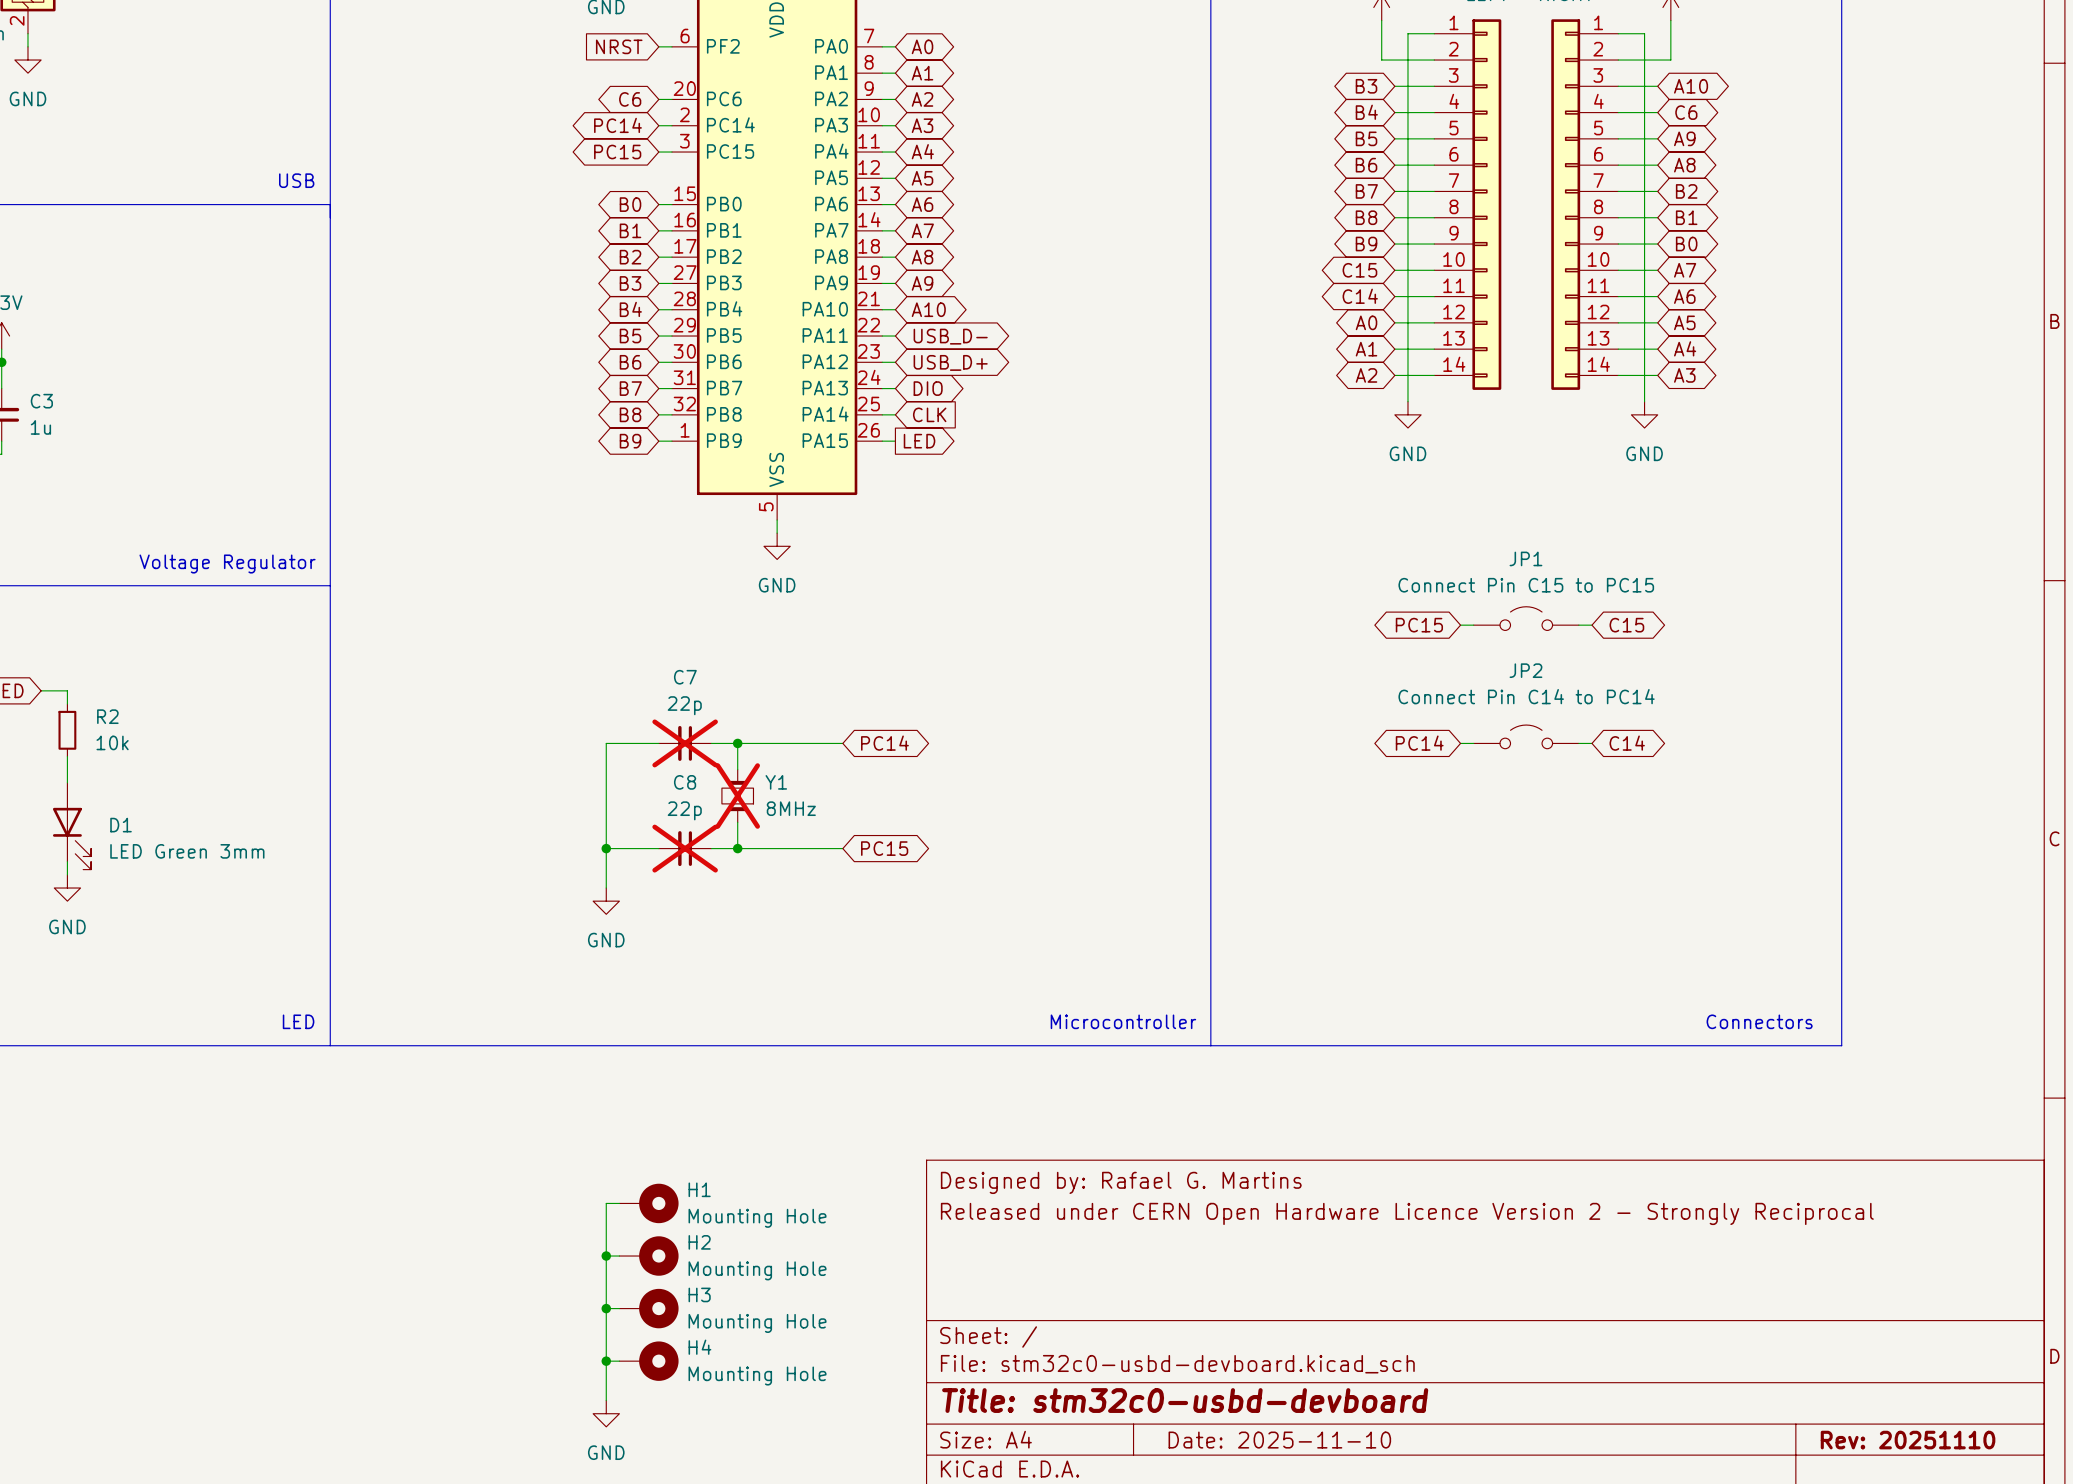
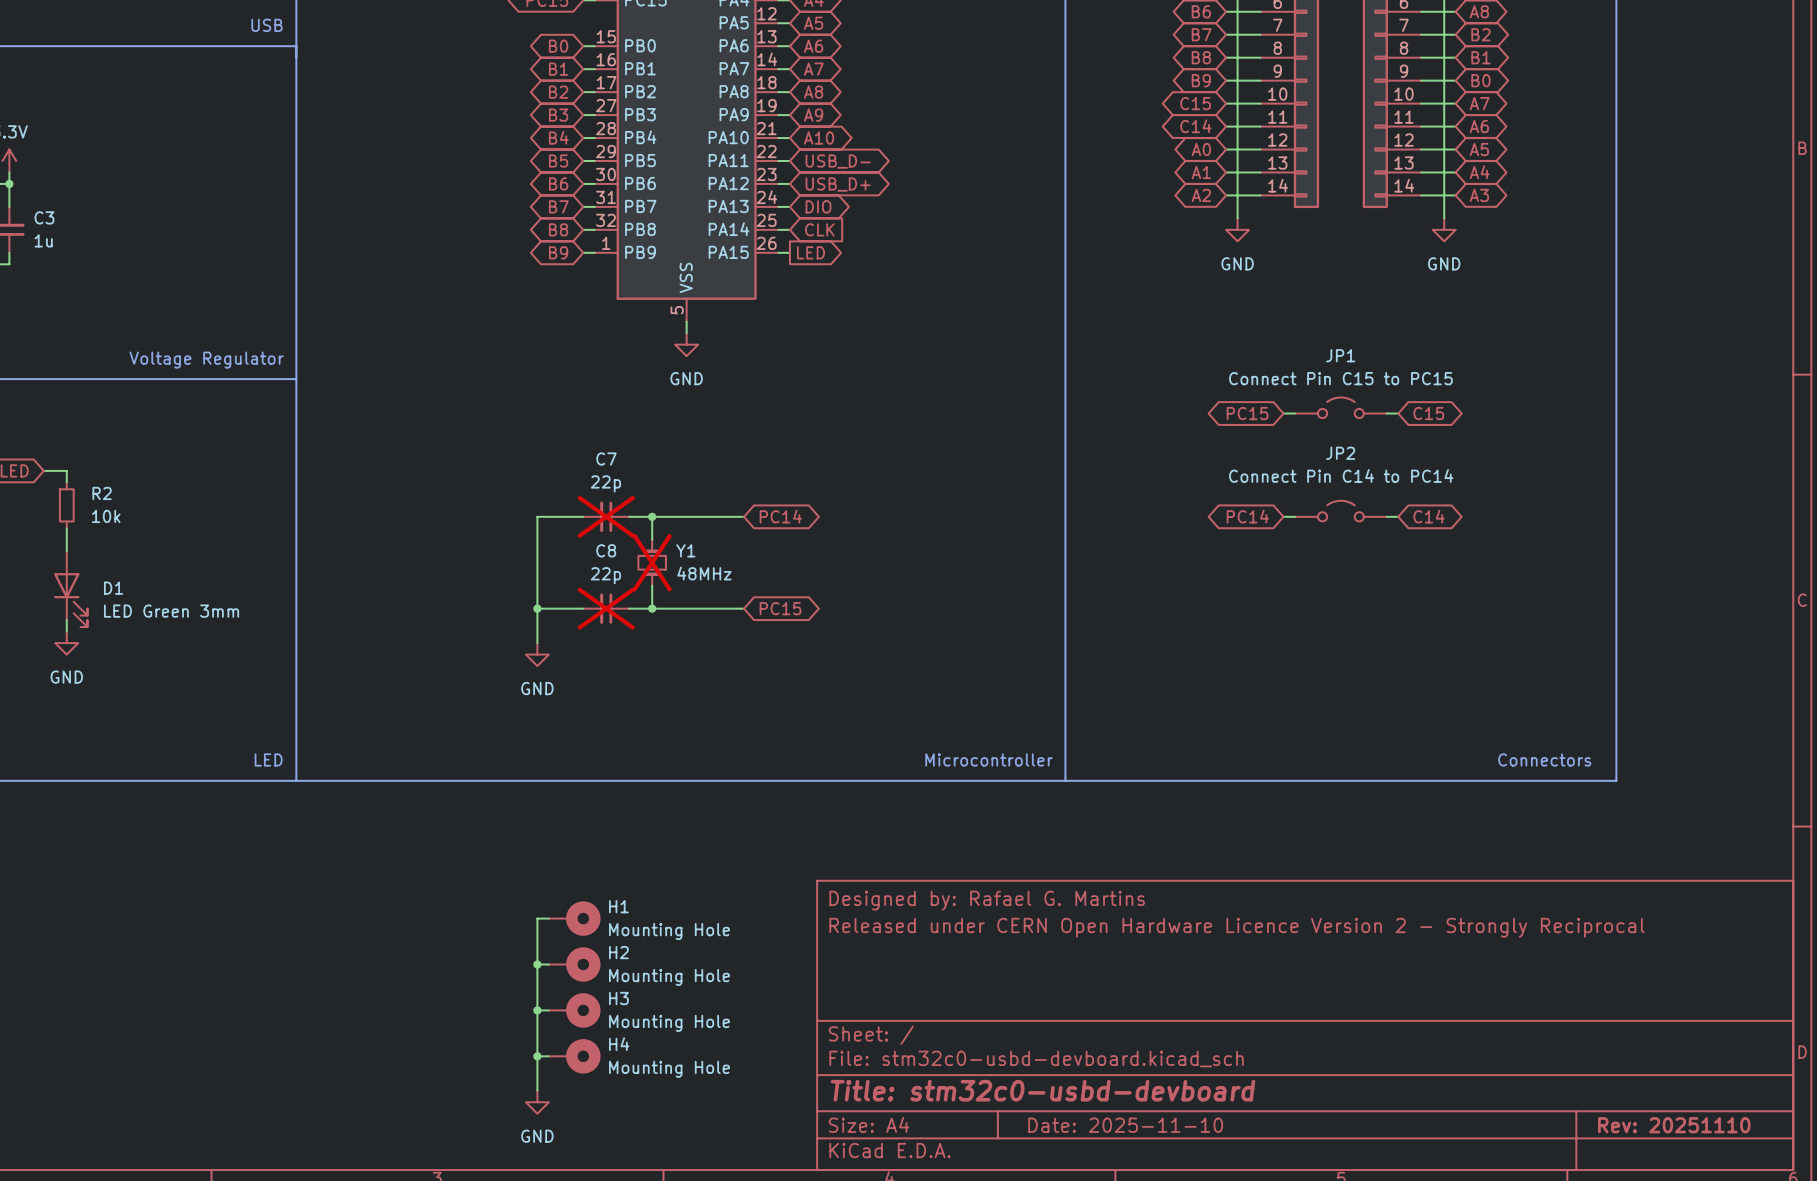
Y1 value: 8MHz (791, 808) -> 48MHz (704, 573)

